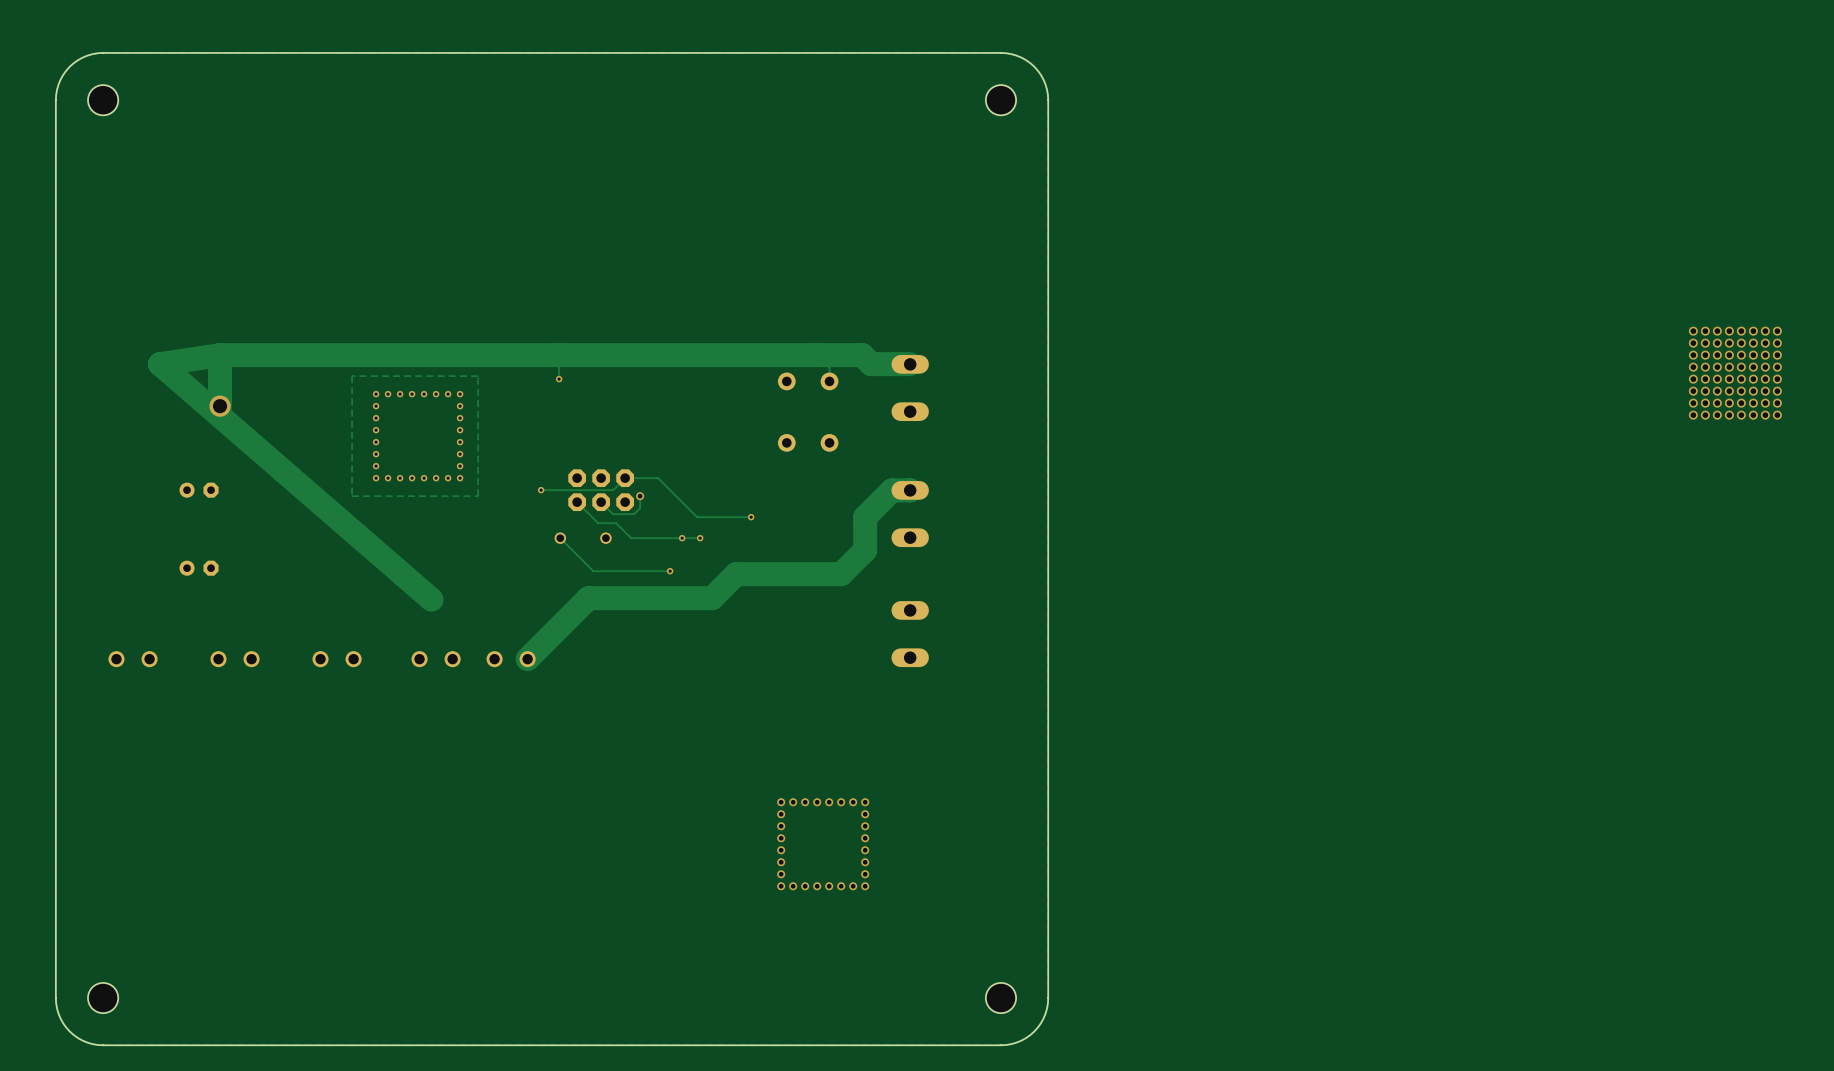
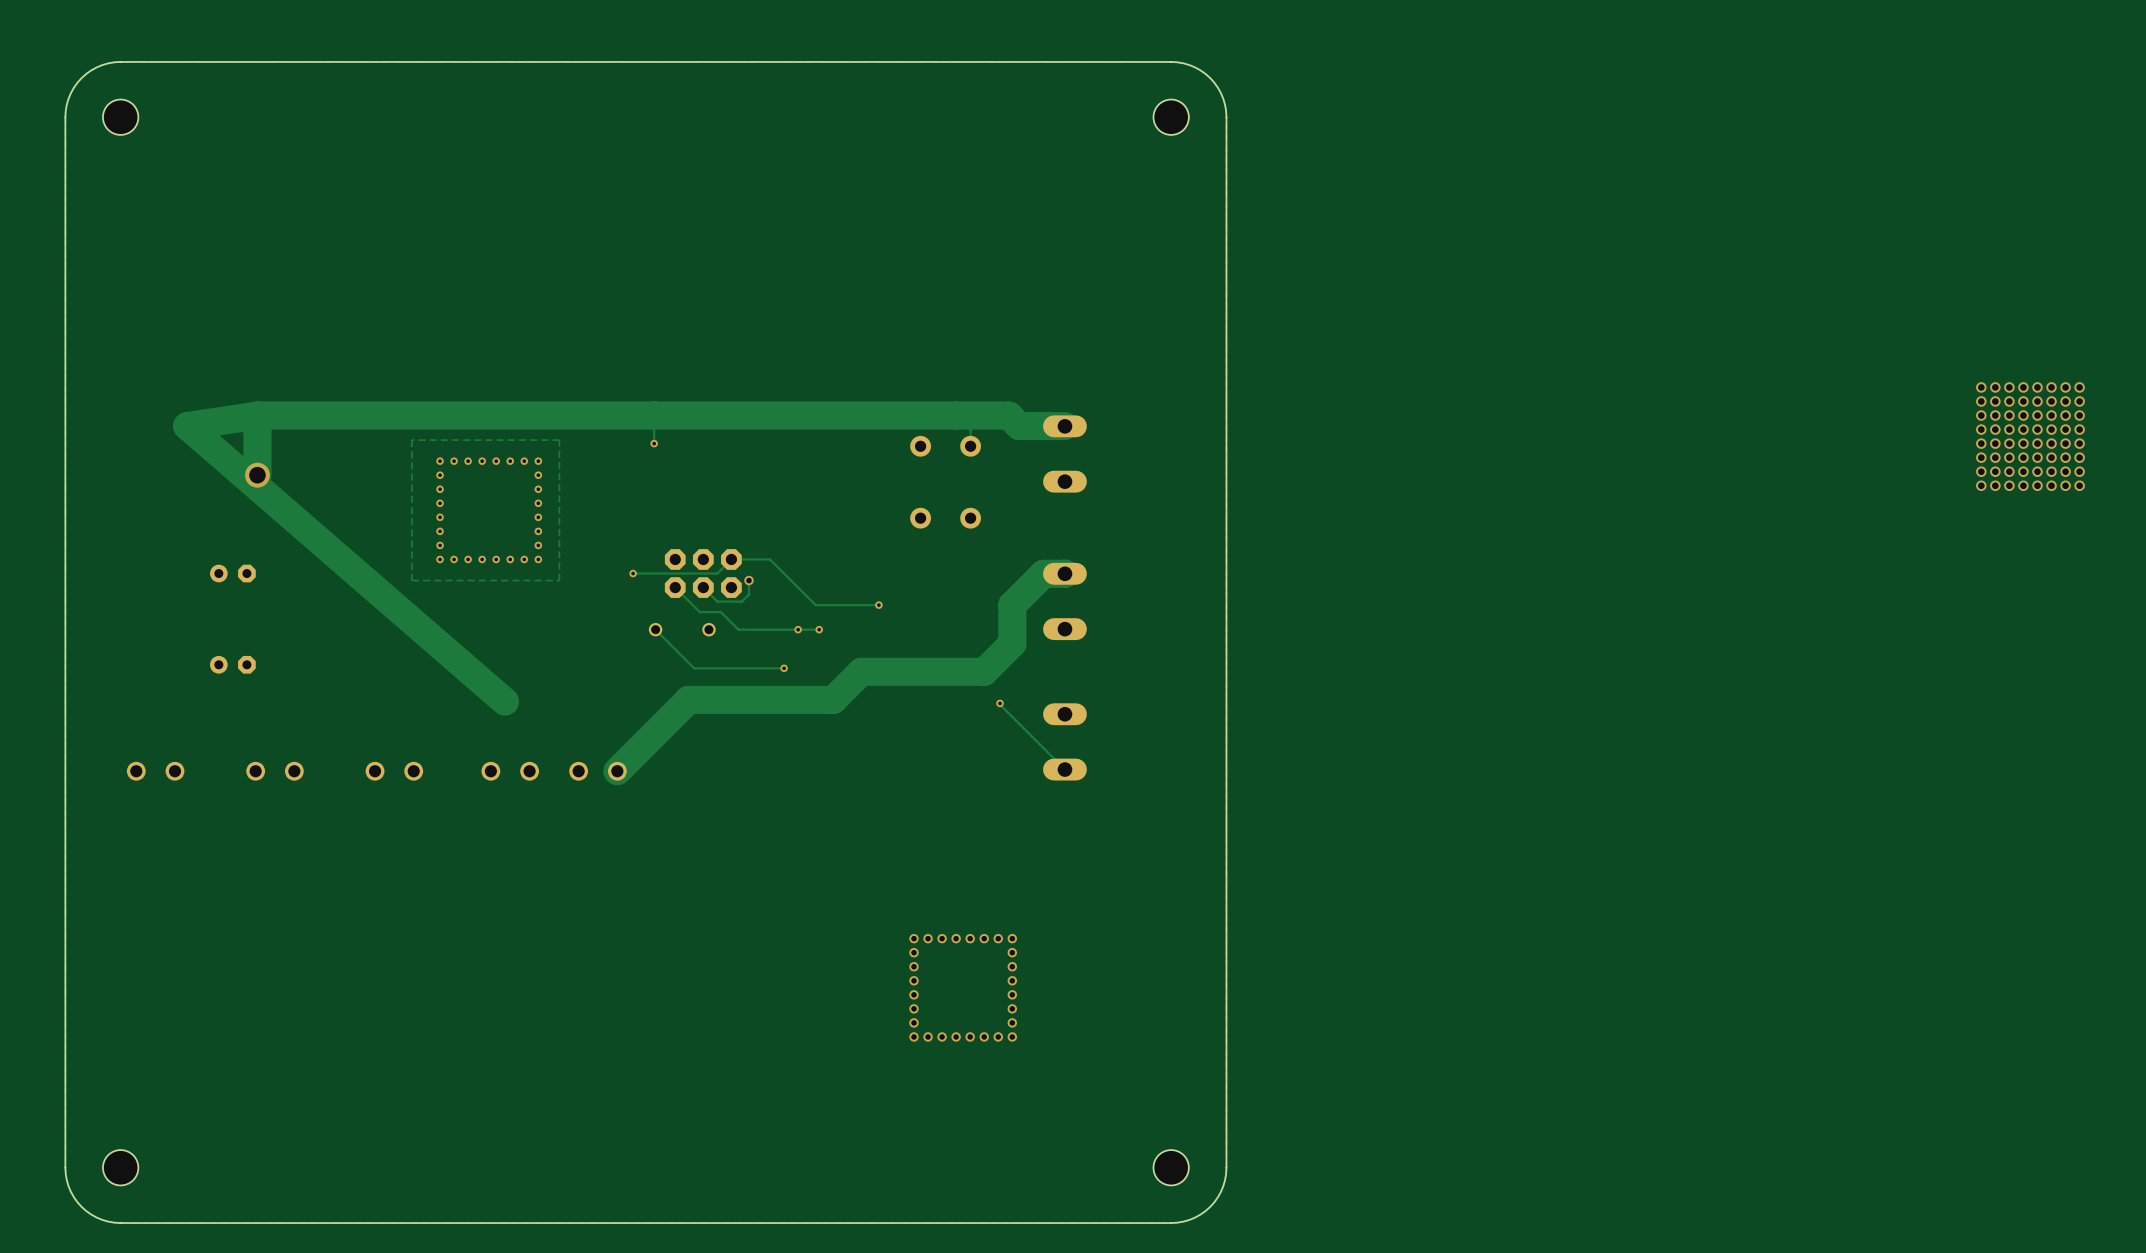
track: none -> (1000, 703) (1064, 769)
via: none -> (1000, 703)

